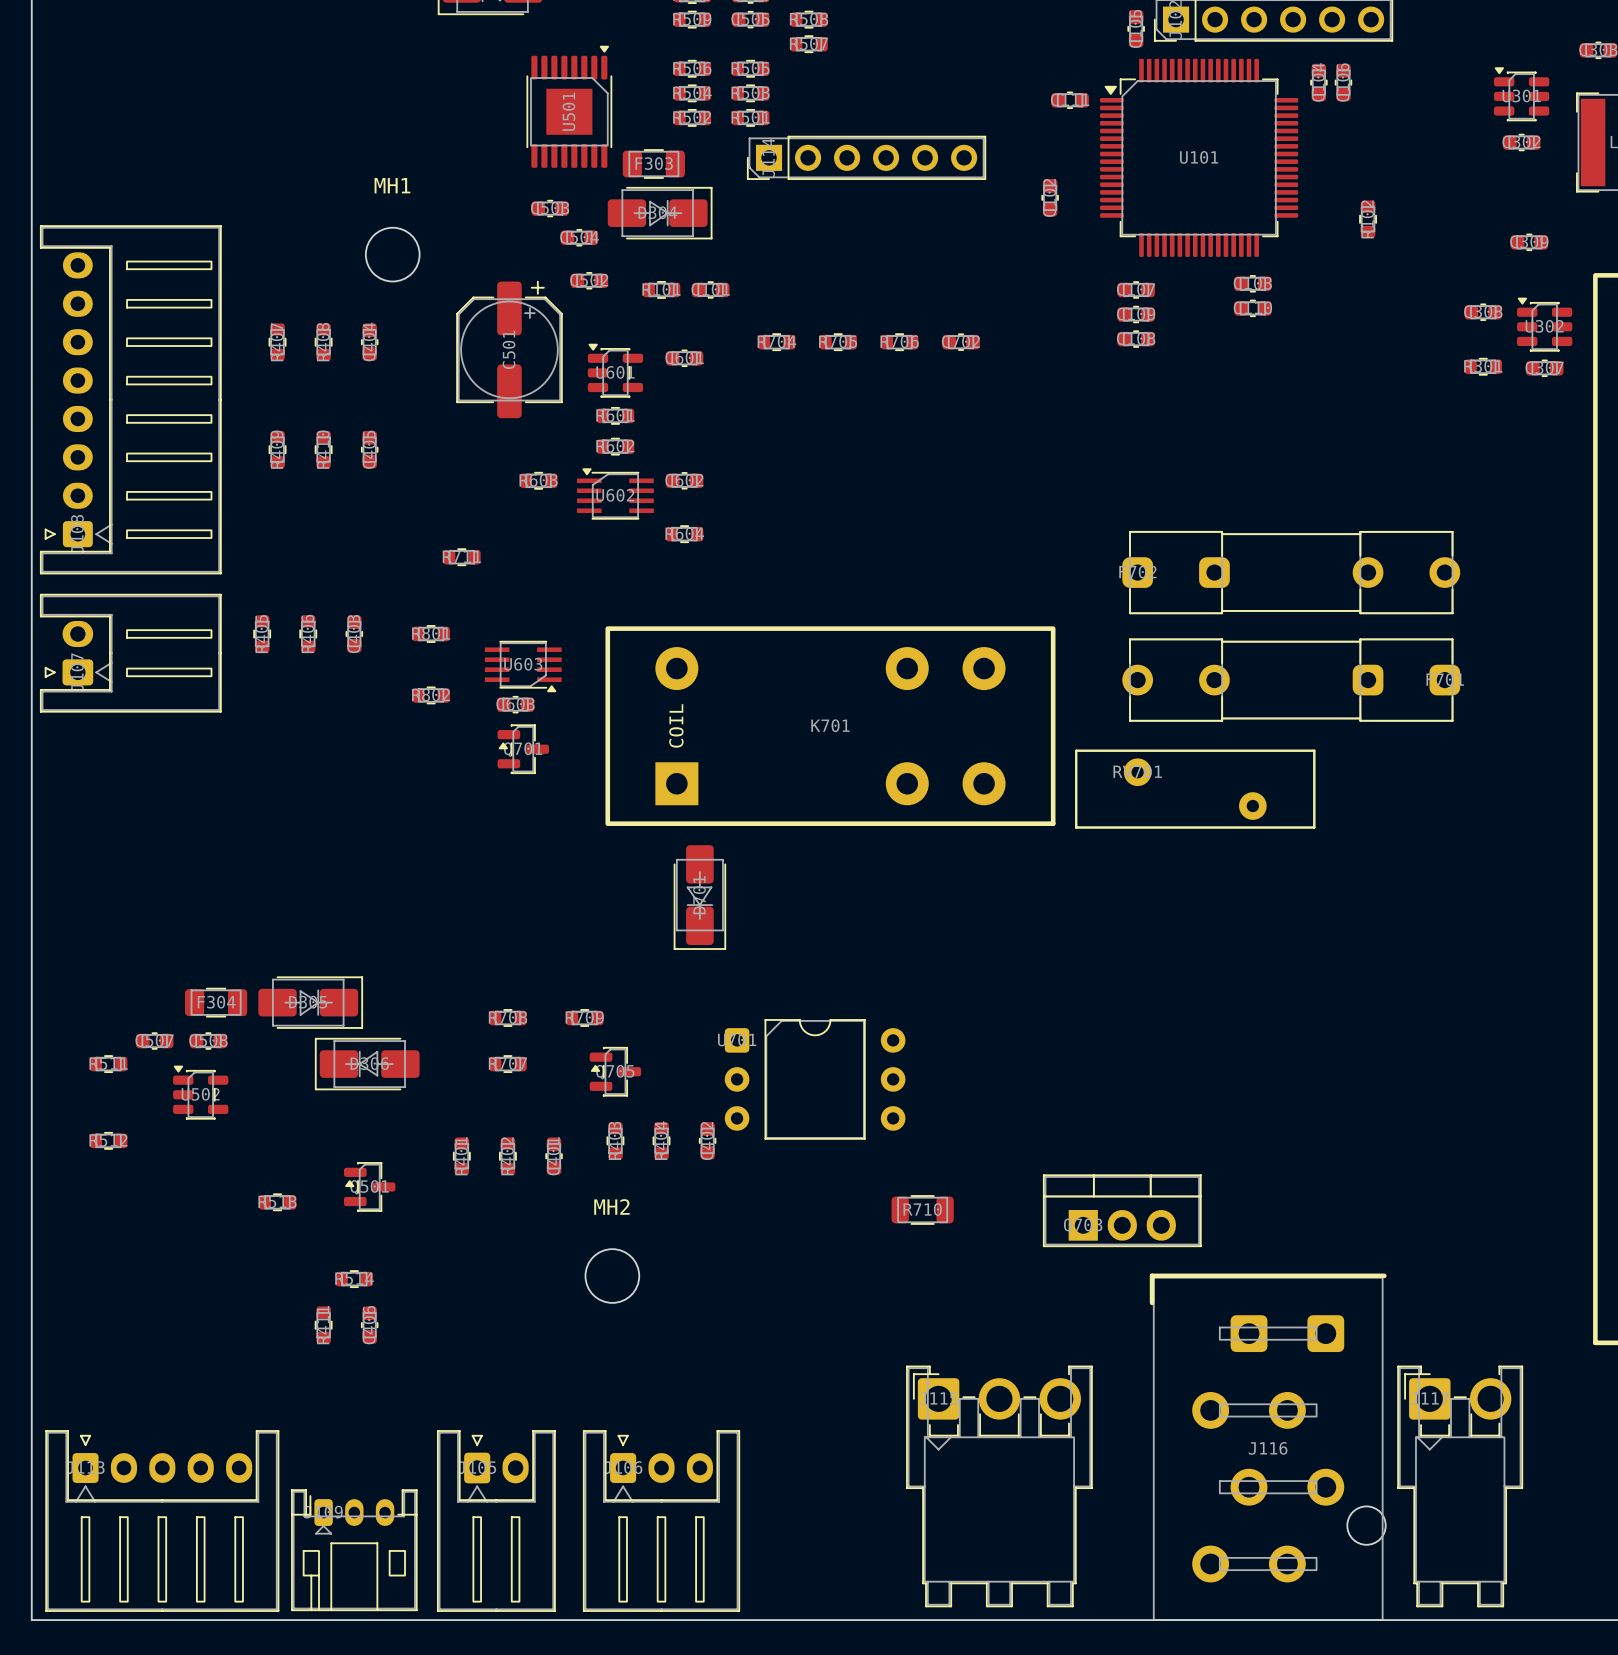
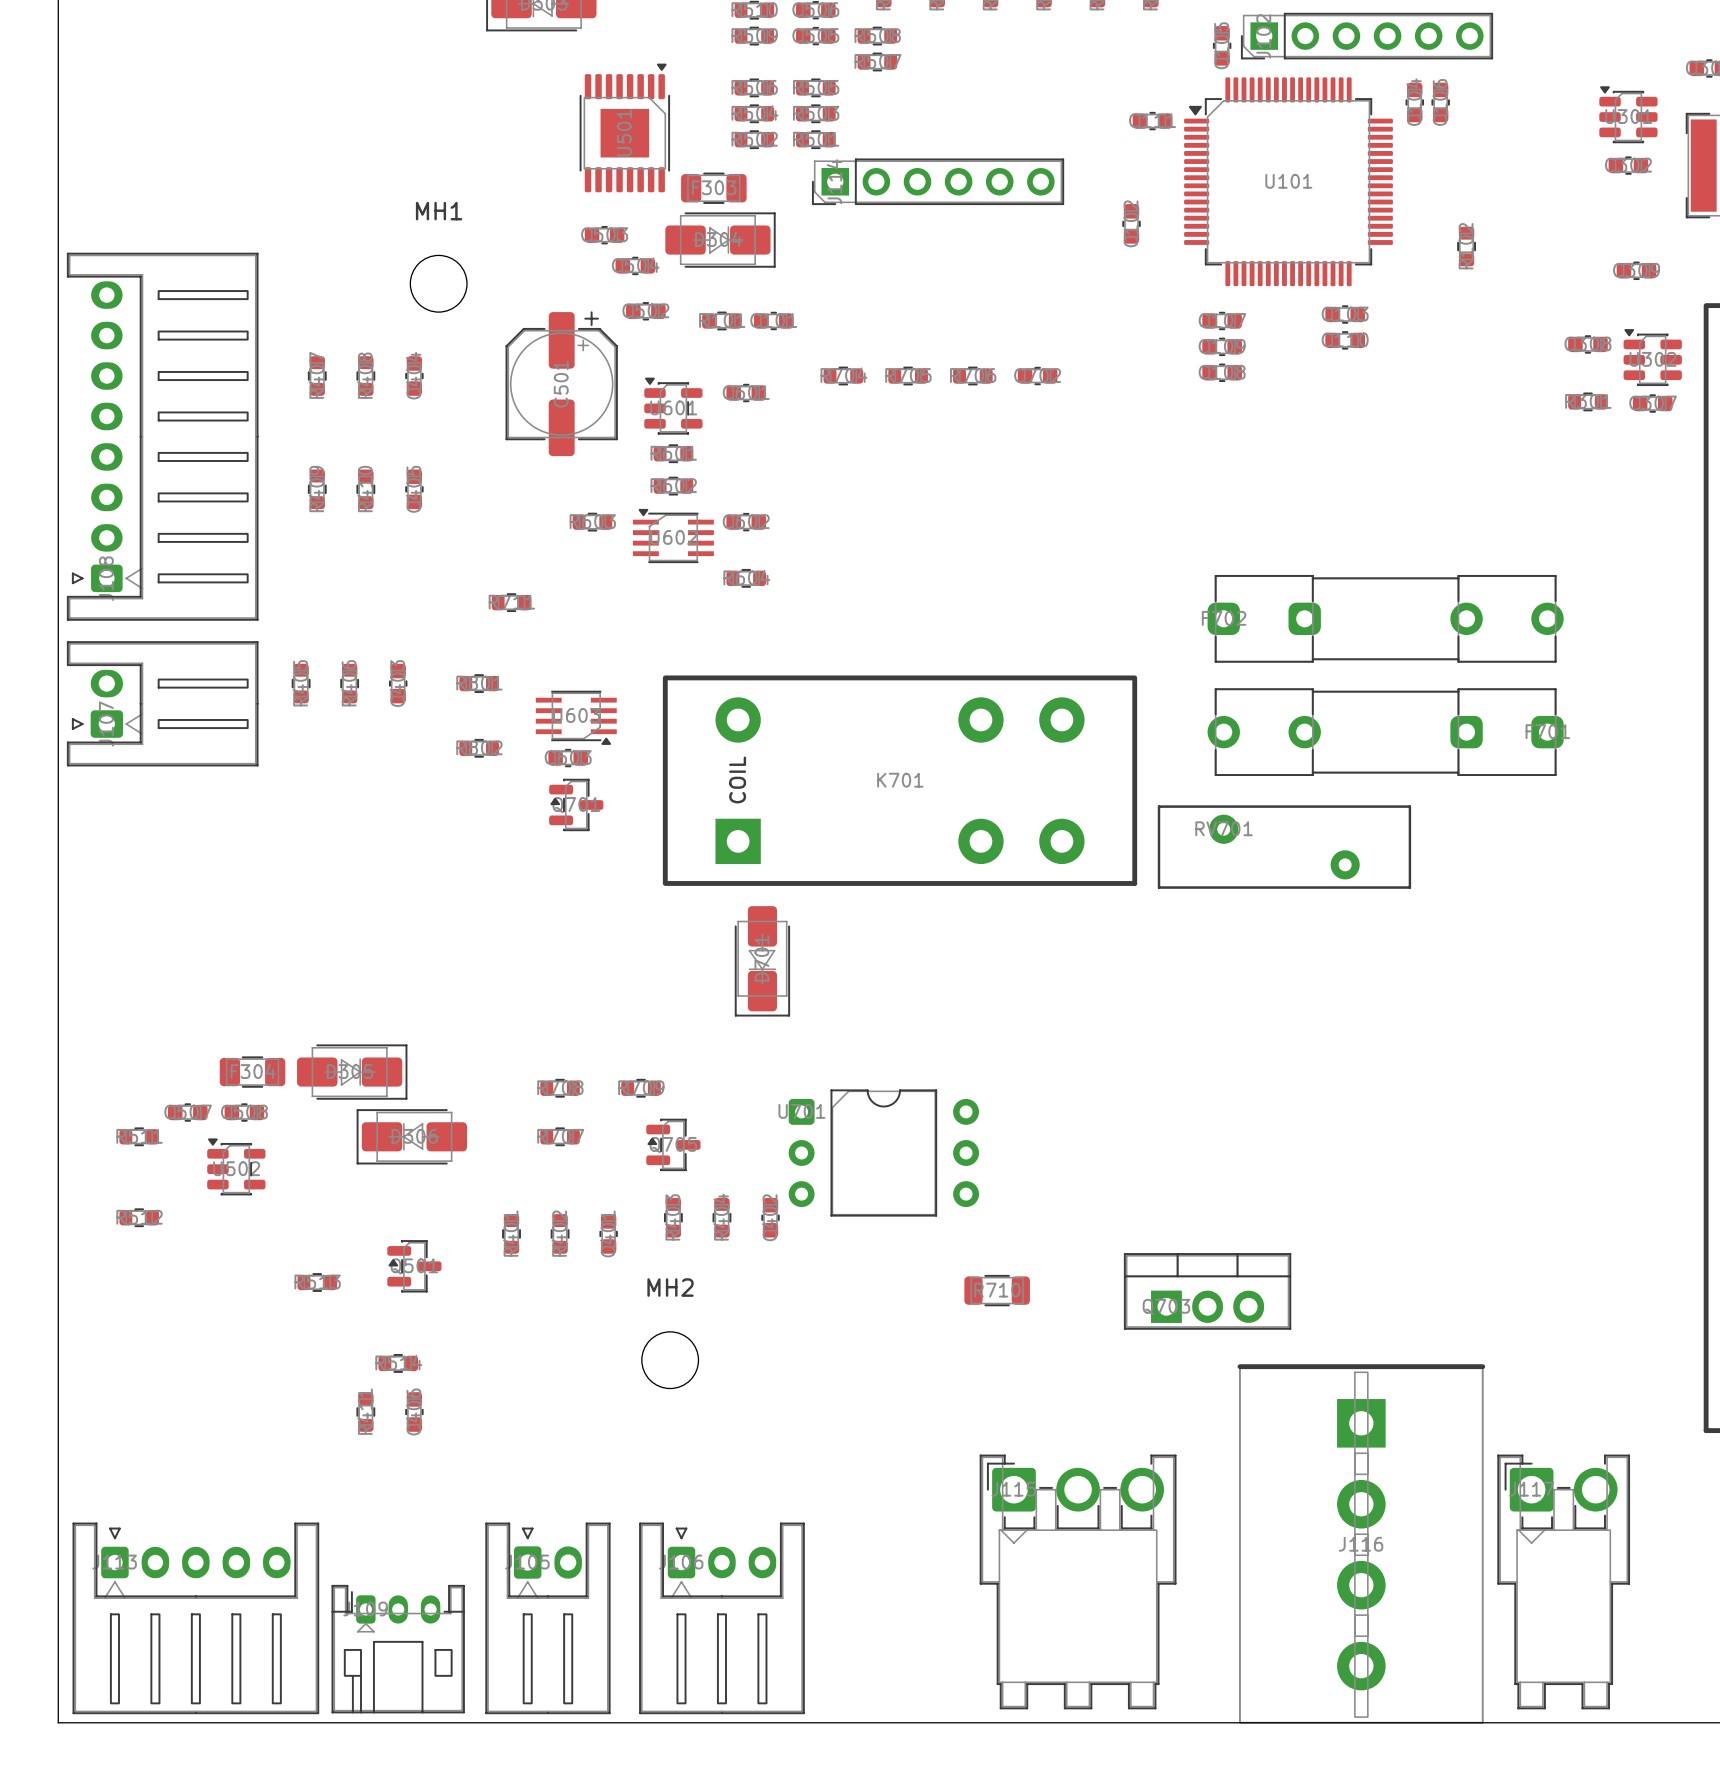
J116 footprint: [1149, 1273, 1387, 1621] -> [1237, 1364, 1486, 1724]

